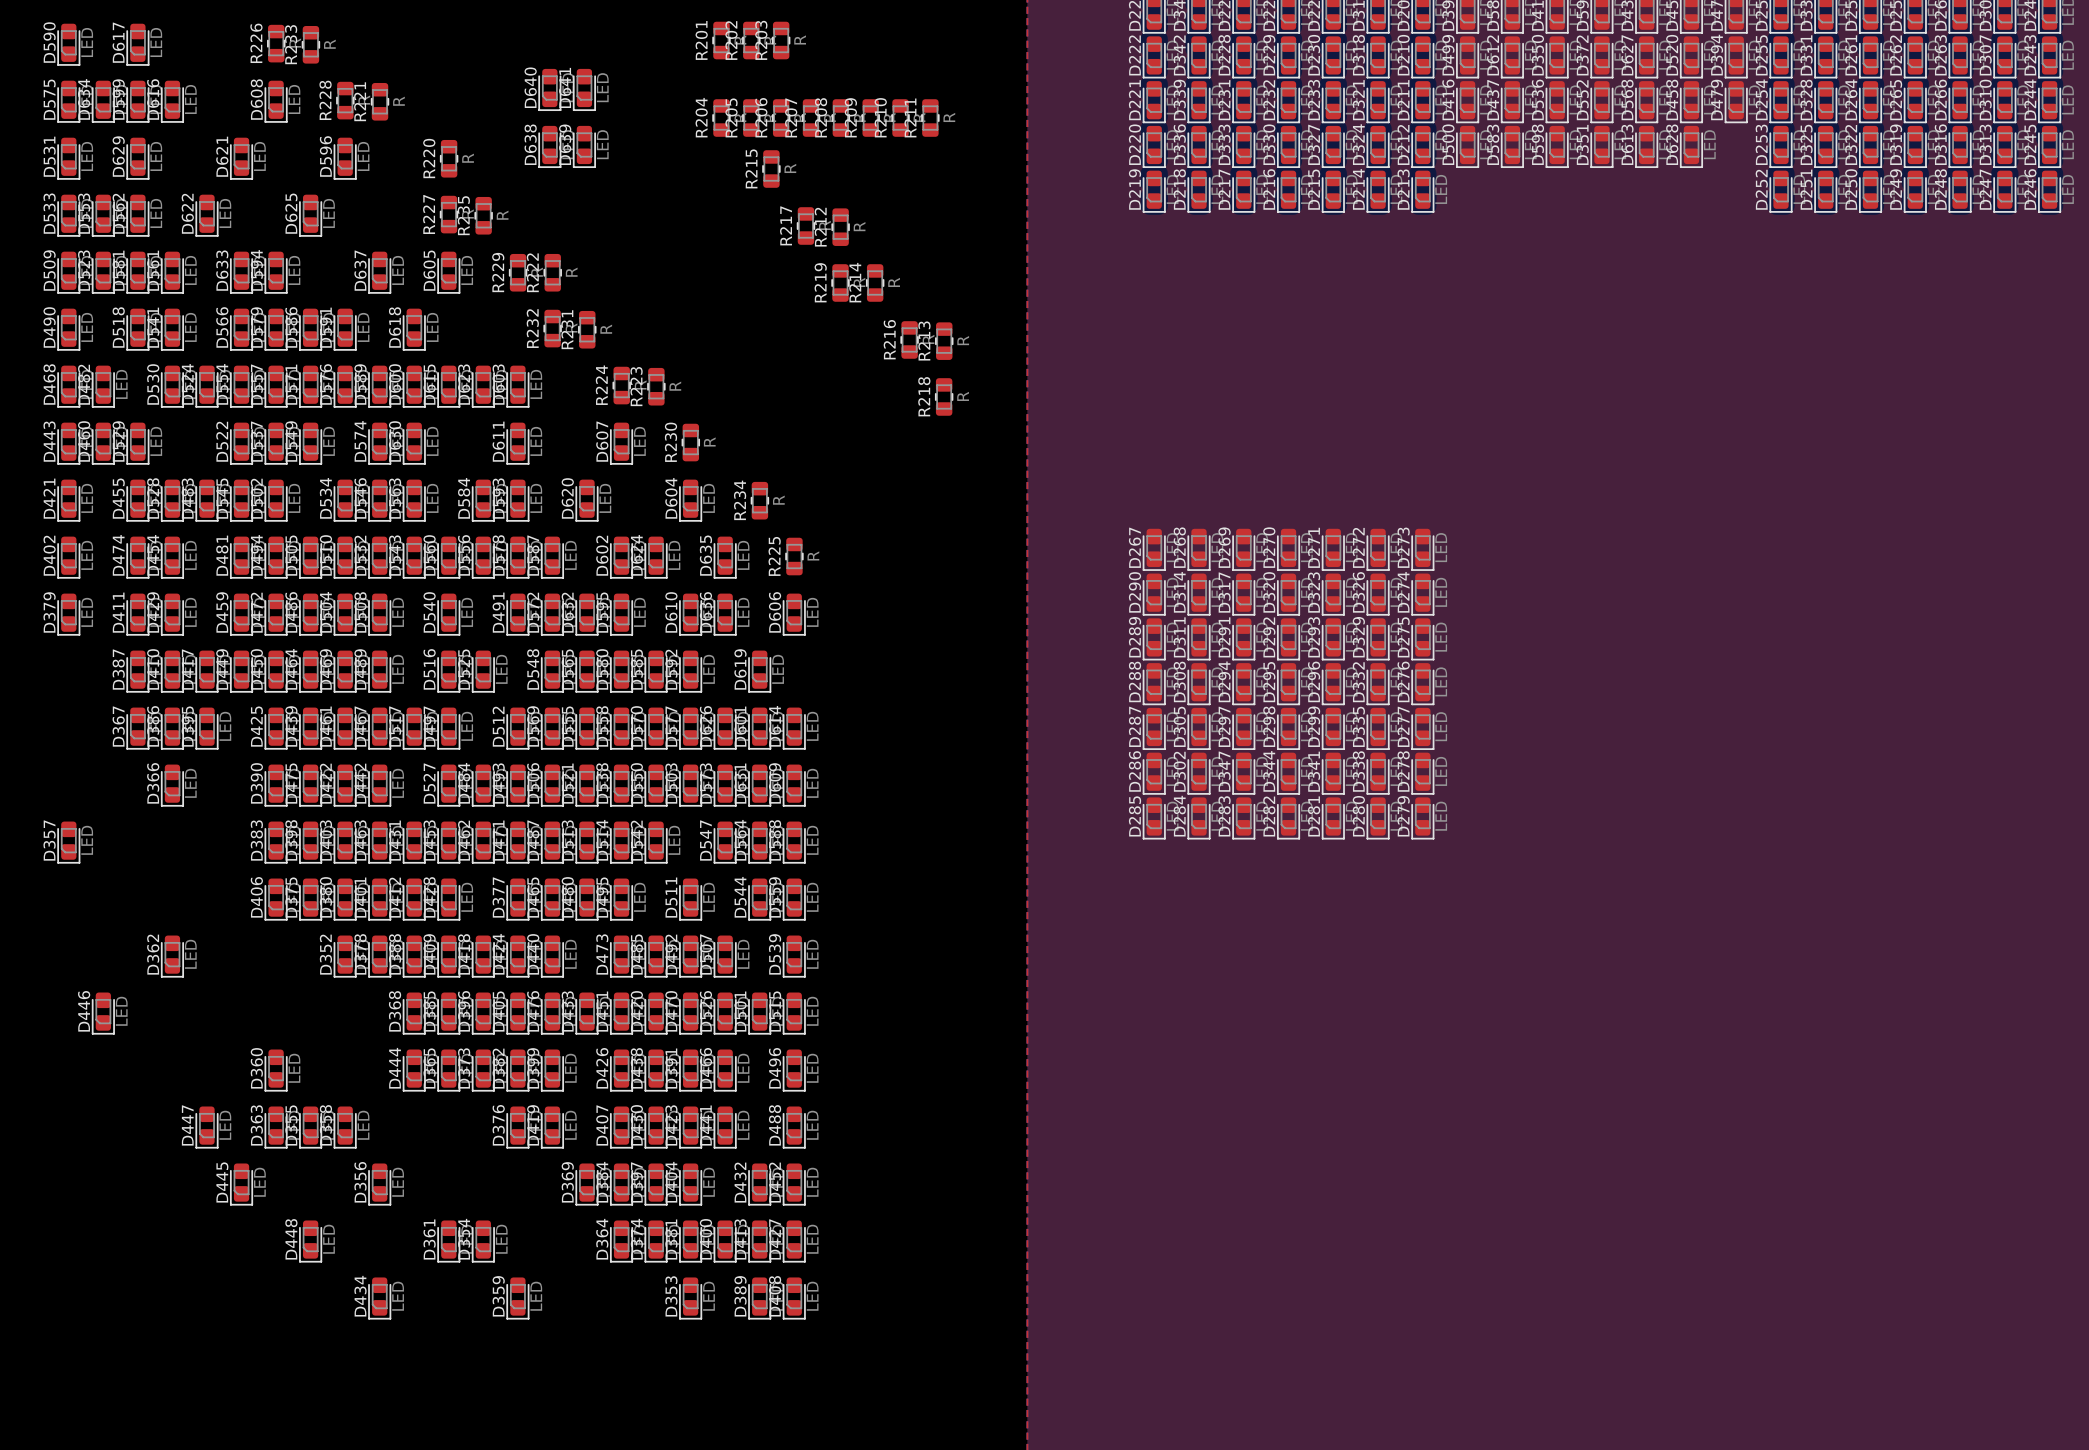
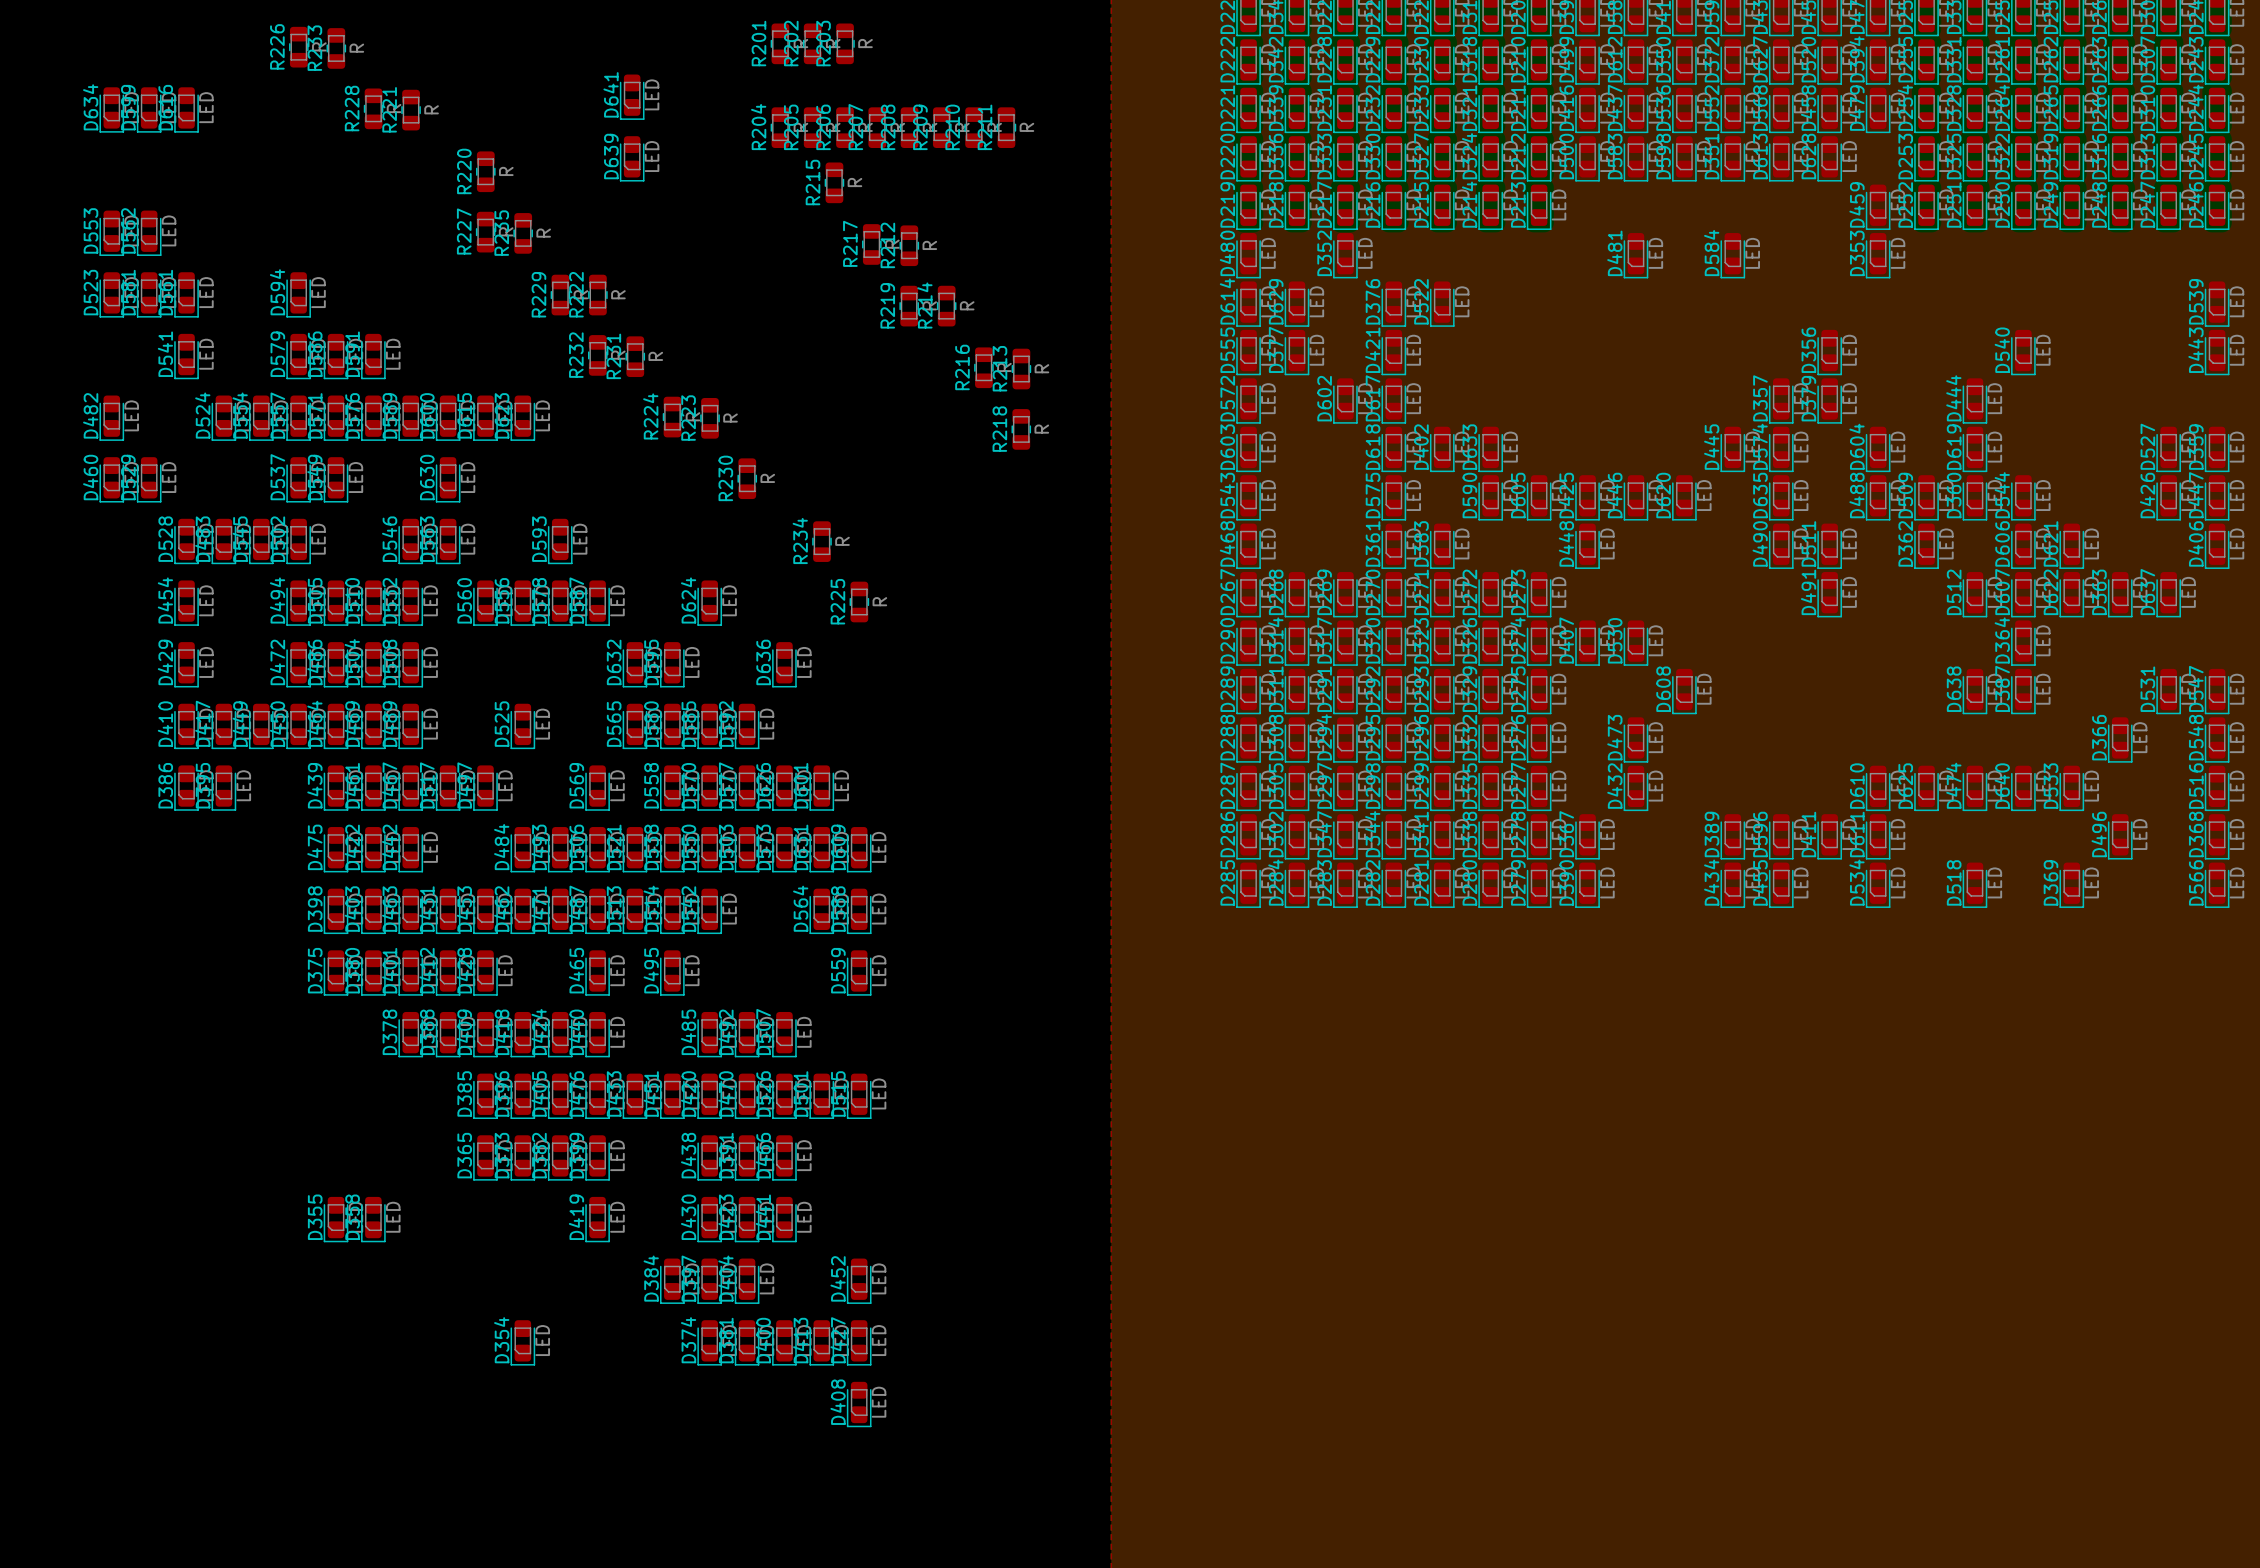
D590 position: (68, 44) -> (1490, 497)
D617 position: (137, 44) -> (1393, 400)
D640 position: (549, 89) -> (2023, 788)
D575 position: (68, 101) -> (1393, 497)
D608 position: (276, 101) -> (1684, 691)
D638 position: (549, 146) -> (1974, 691)
D531 position: (68, 158) -> (2168, 691)
D629 position: (137, 158) -> (1296, 304)
D621 position: (241, 158) -> (2071, 546)
D596 position: (345, 158) -> (1781, 836)
D533 position: (68, 215) -> (2071, 788)
D622 position: (206, 215) -> (2071, 594)
D625 position: (310, 215) -> (1926, 788)
D509 position: (68, 272) -> (1926, 497)
D633 position: (241, 272) -> (1490, 449)
D637 position: (379, 272) -> (2168, 594)
D605 position: (448, 272) -> (1539, 497)
D490 position: (68, 329) -> (1781, 546)
D518 position: (137, 329) -> (1974, 885)
D566 position: (241, 329) -> (2217, 885)
D618 position: (414, 329) -> (1393, 449)
D468 position: (68, 386) -> (1248, 546)
D530 position: (172, 386) -> (1635, 643)
D603 position: (517, 386) -> (1248, 449)
D443 position: (68, 443) -> (2217, 352)
D522 position: (241, 443) -> (1442, 304)
D574 position: (379, 443) -> (1781, 449)
D611 position: (517, 443) -> (1878, 836)
D607 position: (621, 443) -> (2023, 594)
D421 position: (68, 500) -> (1393, 352)
D455 position: (137, 500) -> (1781, 885)
D534 position: (345, 500) -> (1878, 885)
D584 position: (483, 500) -> (1732, 255)
D620 position: (586, 500) -> (1684, 497)
D604 position: (690, 500) -> (1878, 449)
D402 position: (68, 557) -> (1442, 449)
D474 position: (137, 557) -> (1974, 788)
D481 position: (241, 557) -> (1635, 255)
D543 position: (414, 557) -> (1248, 497)
D602 position: (621, 557) -> (1345, 400)
D635 position: (725, 557) -> (1781, 497)
D379 position: (68, 614) -> (1829, 400)
D411 position: (137, 614) -> (1829, 836)
D459 position: (241, 614) -> (1878, 207)
D540 position: (448, 614) -> (2023, 352)
D491 position: (517, 614) -> (1829, 594)
D572 position: (552, 614) -> (1248, 400)
D610 position: (690, 614) -> (1878, 788)
D606 position: (794, 614) -> (2023, 546)
D387 position: (137, 671) -> (2023, 691)
D516 position: (448, 671) -> (2217, 788)
D548 position: (552, 671) -> (2217, 739)
D619 position: (759, 671) -> (1974, 449)
D367 position: (137, 728) -> (1587, 836)
D425 position: (276, 728) -> (1587, 497)
D512 position: (517, 728) -> (1974, 594)
D555 position: (586, 728) -> (1248, 352)
D614 position: (794, 728) -> (1248, 304)
D366 position: (172, 785) -> (2120, 739)
D390 position: (276, 785) -> (1587, 885)
D527 position: (448, 785) -> (2168, 449)
D357 position: (68, 842) -> (1781, 400)
D383 position: (276, 842) -> (1442, 546)
D547 position: (725, 842) -> (2217, 691)
D406 position: (276, 899) -> (2217, 546)
D377 position: (517, 899) -> (1296, 352)
D480 position: (586, 899) -> (1248, 255)
D511 position: (690, 899) -> (1829, 546)
D544 position: (759, 899) -> (2023, 497)
D362 position: (172, 956) -> (1926, 546)
D352 position: (345, 956) -> (1345, 255)
D473 position: (621, 956) -> (1635, 739)
D539 position: (794, 956) -> (2217, 304)
D446 position: (103, 1013) -> (1635, 497)
D368 position: (414, 1013) -> (2217, 836)
D360 position: (276, 1070) -> (1974, 497)
D444 position: (414, 1070) -> (1974, 400)
D426 position: (621, 1070) -> (2168, 497)
D496 position: (794, 1070) -> (2120, 836)
D447 position: (206, 1127) -> (2217, 497)
D363 position: (276, 1127) -> (2120, 594)
D376 position: (517, 1127) -> (1393, 304)
D407 position: (621, 1127) -> (1587, 643)
D488 position: (794, 1127) -> (1878, 497)
D445 position: (241, 1184) -> (1732, 449)
D356 position: (379, 1184) -> (1829, 352)
D369 position: (586, 1184) -> (2071, 885)
D432 position: (759, 1184) -> (1635, 788)
D448 position: (310, 1241) -> (1587, 546)
D361 position: (448, 1241) -> (1393, 546)
D364 position: (621, 1241) -> (2023, 643)
D434 position: (379, 1298) -> (1732, 885)
D359 position: (517, 1298) -> (2217, 449)
D353 position: (690, 1298) -> (1878, 255)
D389 position: (759, 1298) -> (1732, 836)

